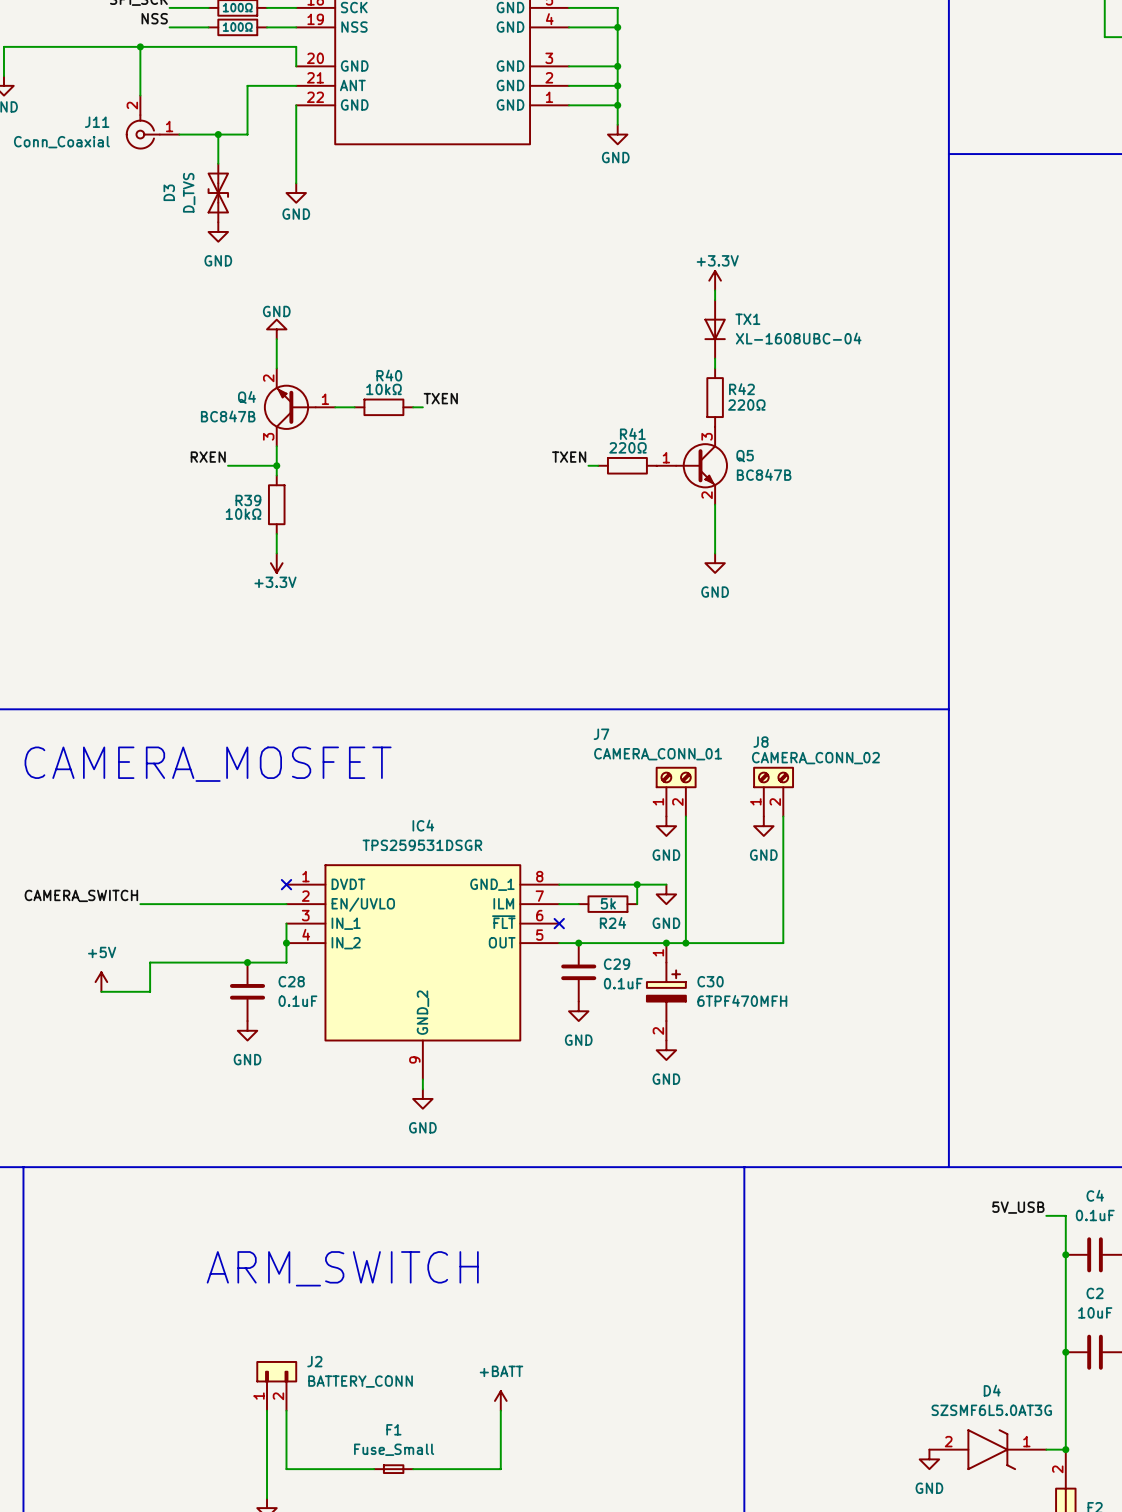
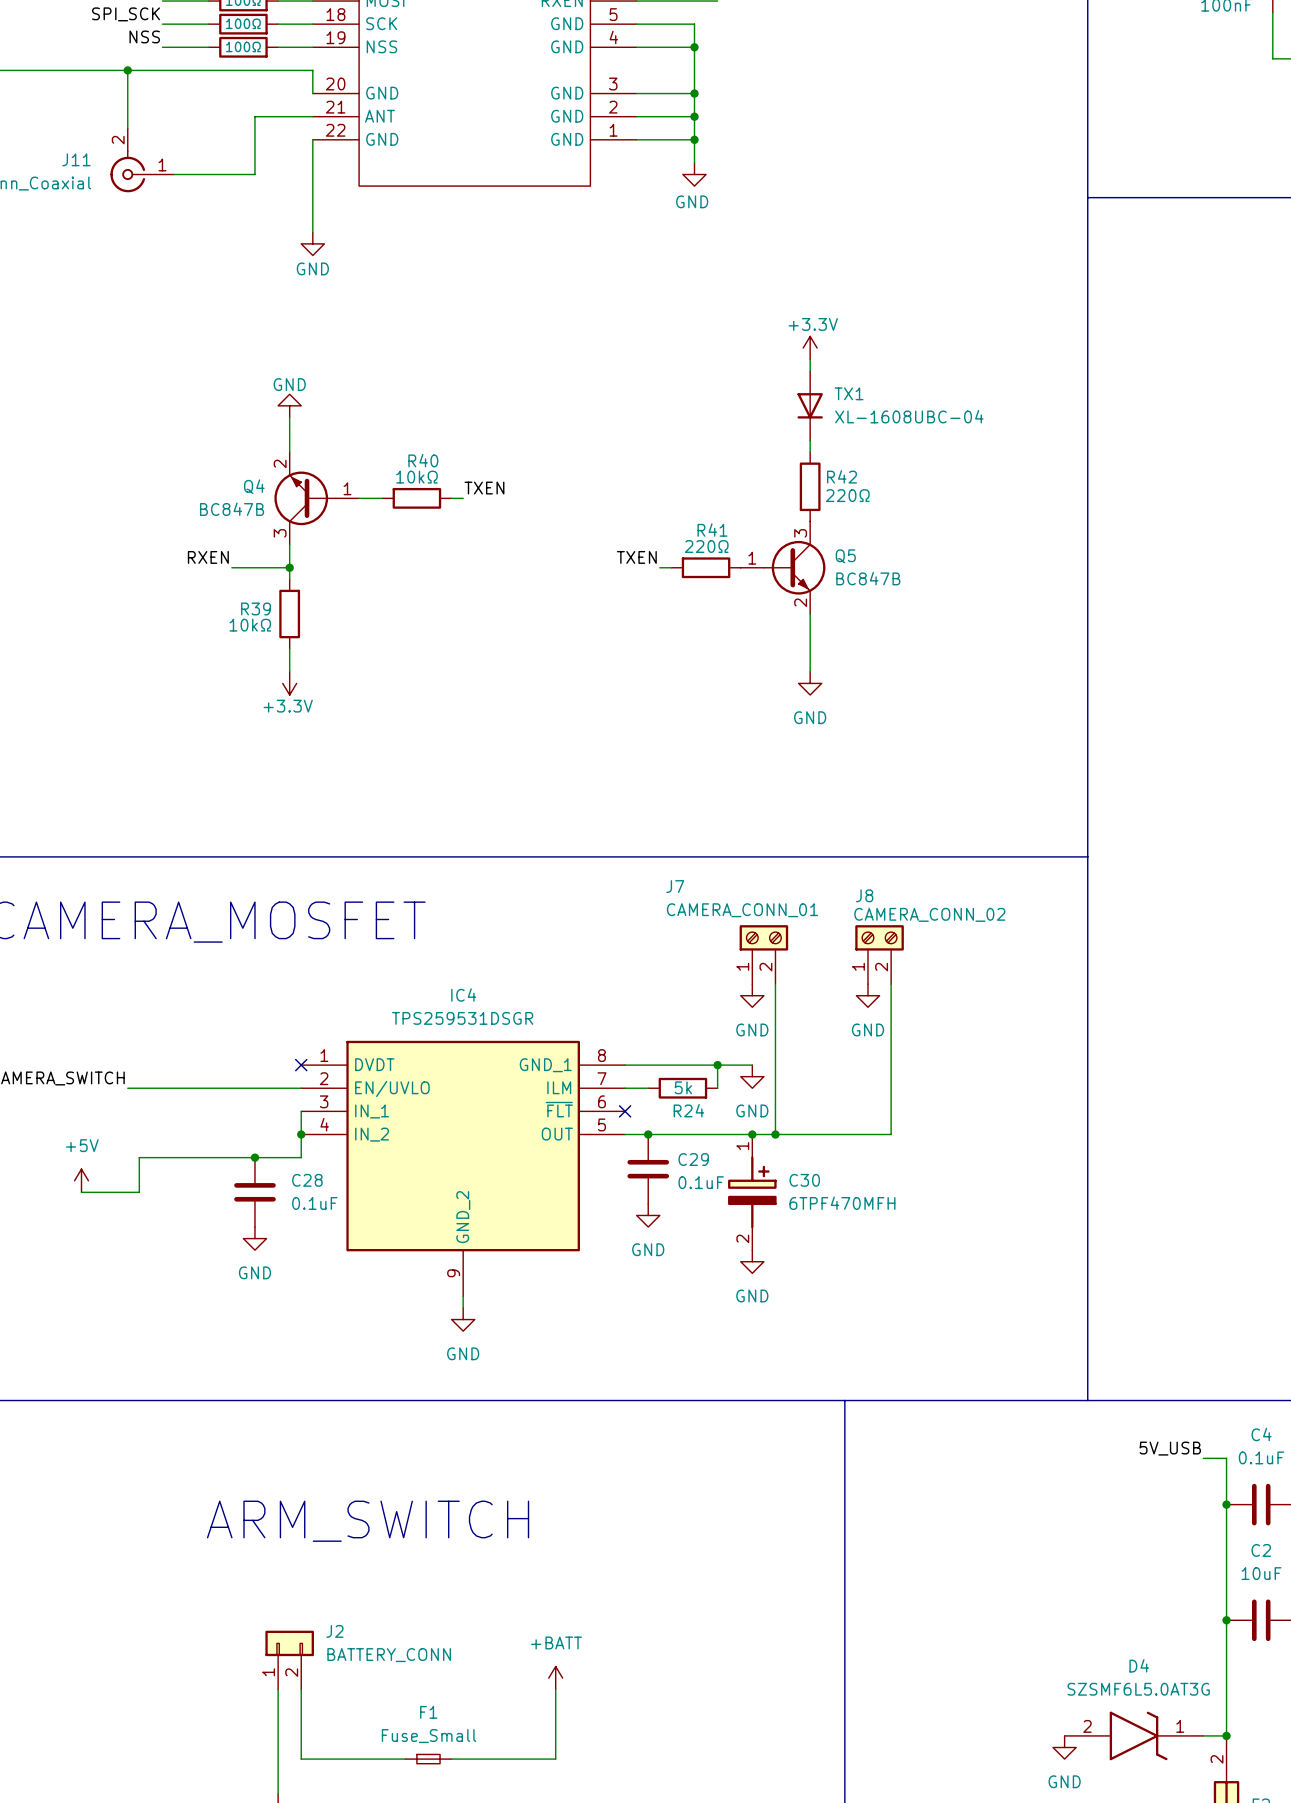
wire: (218, 134) (218, 163) -> none
junction: (218, 134) -> none
D3: D_TVS (218, 193) -> none
power symbol: GND (218, 231) -> none

